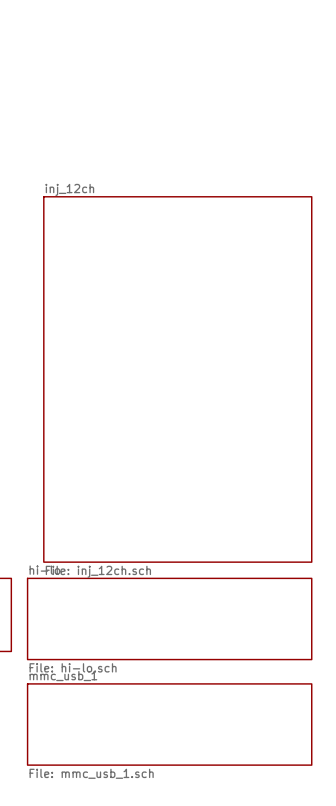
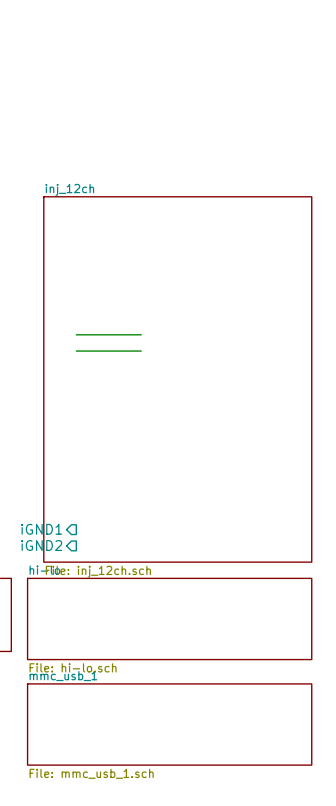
wire: none -> (76, 334) (141, 334)
wire: none -> (76, 351) (141, 351)
sheet pin: none -> iGND1 (41, 529)
sheet pin: none -> iGND2 (41, 545)

